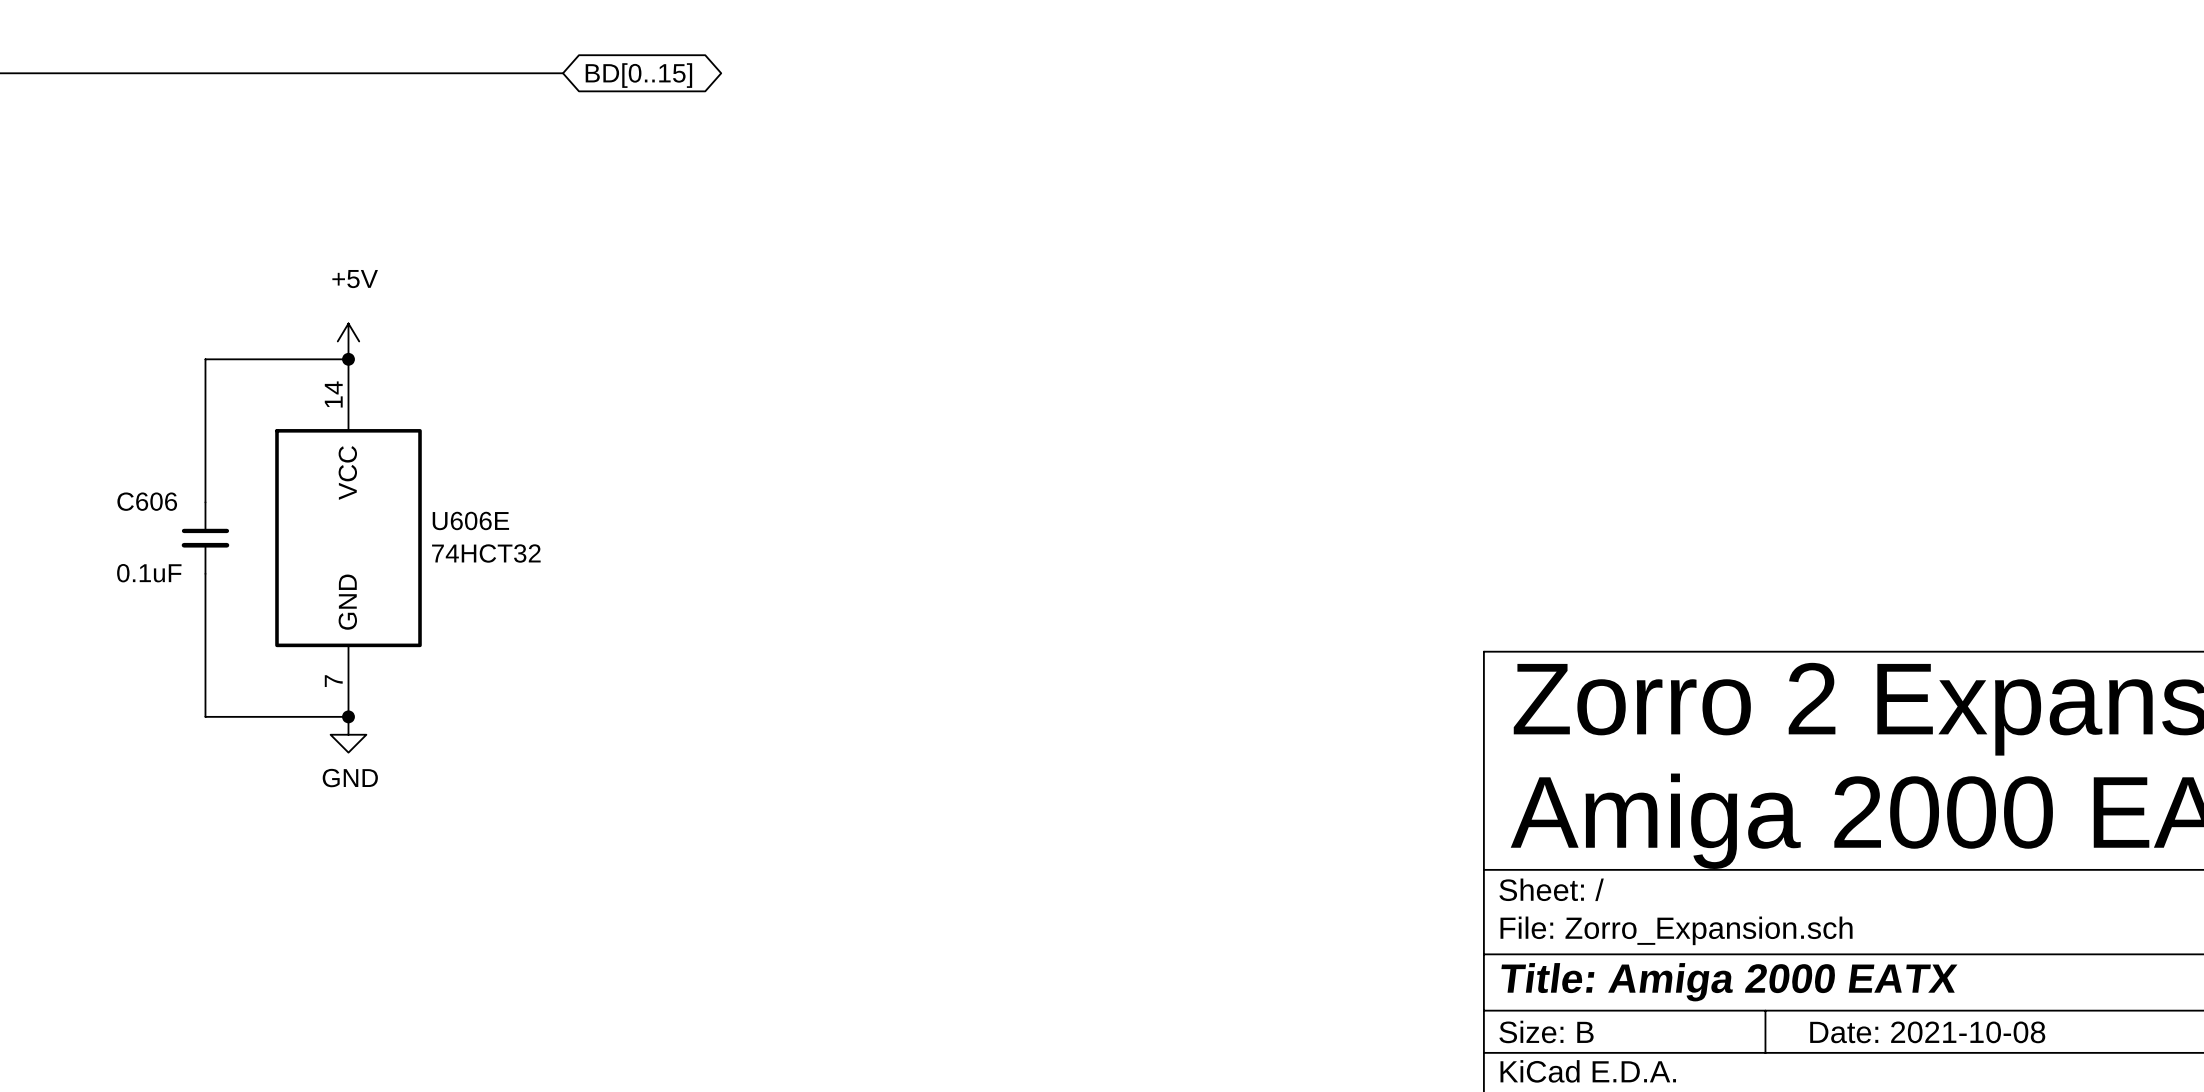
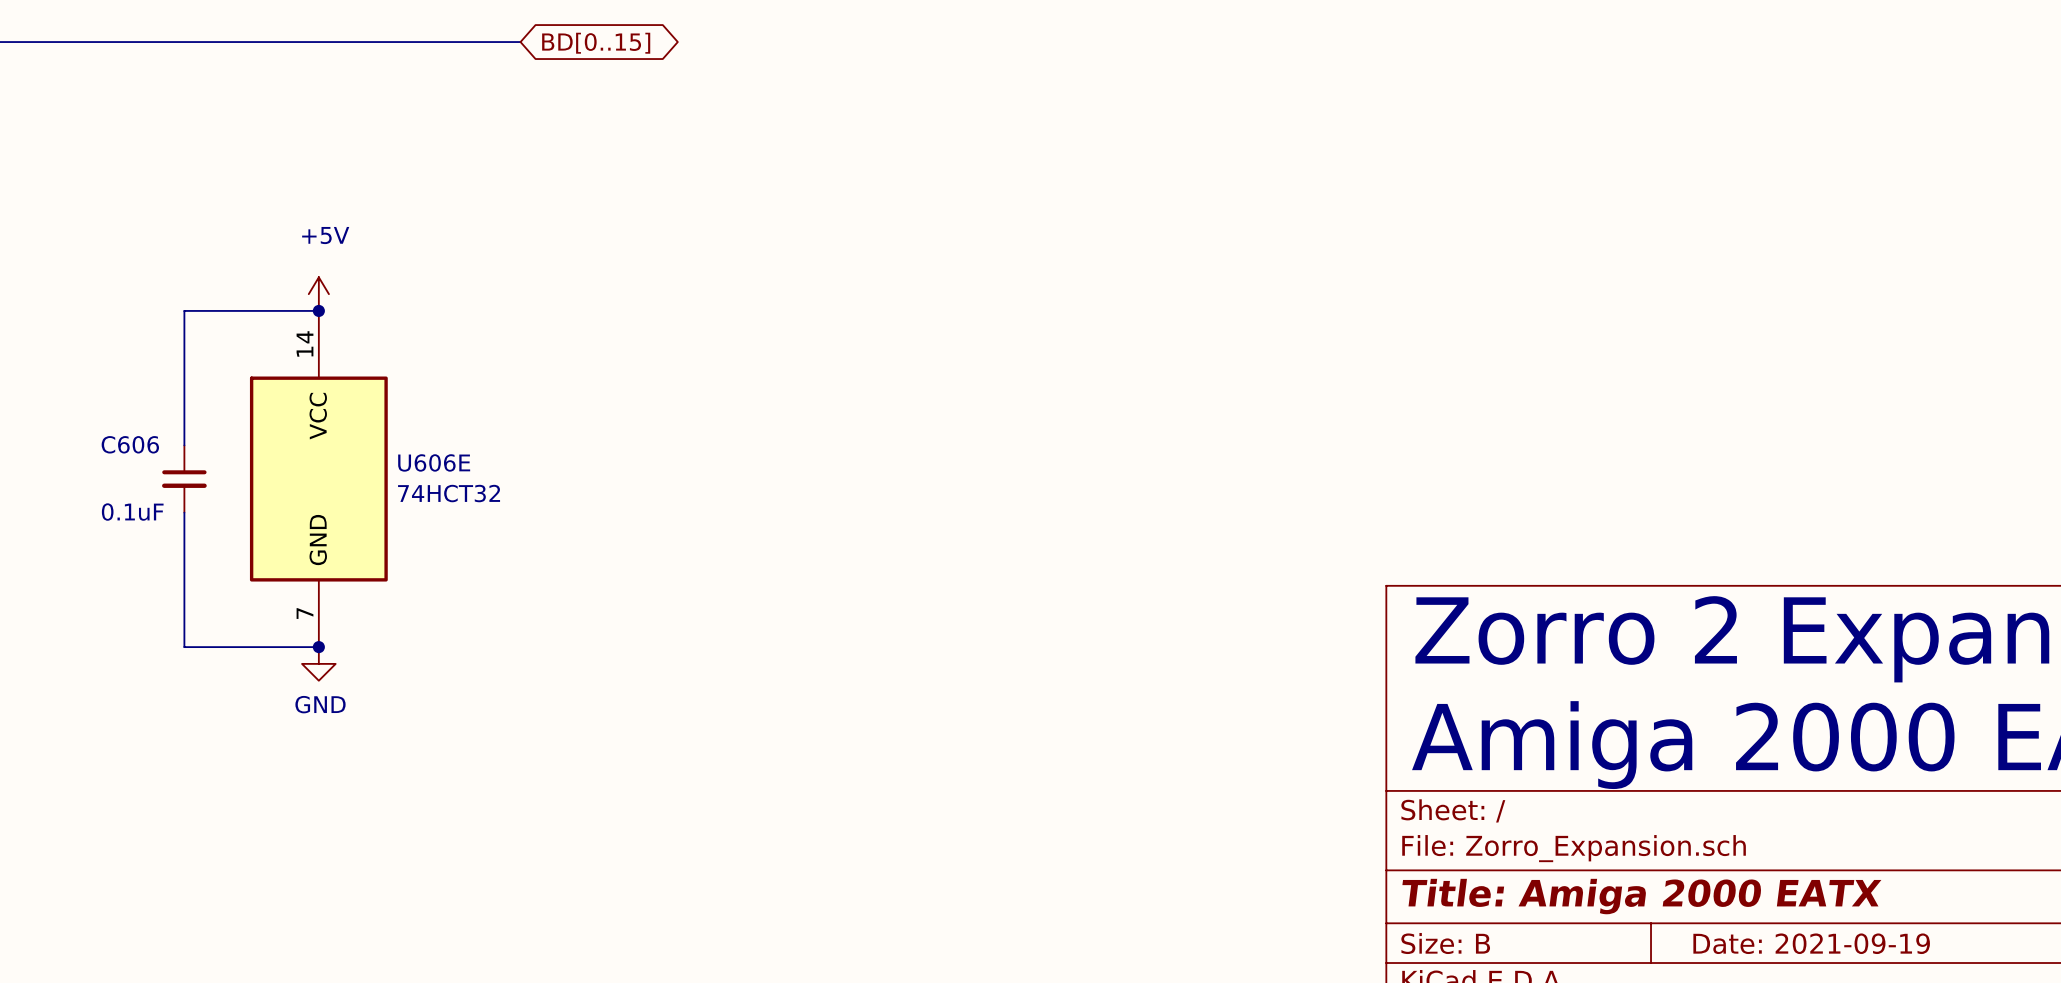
title block: Date: 2021-10-08 (1927, 1032) -> Date: 2021-09-19 (1811, 943)

